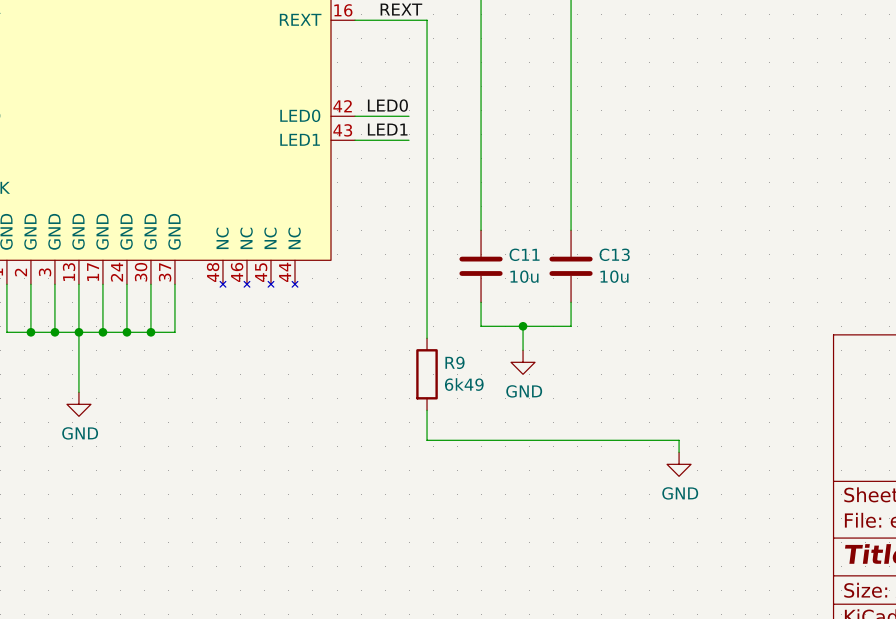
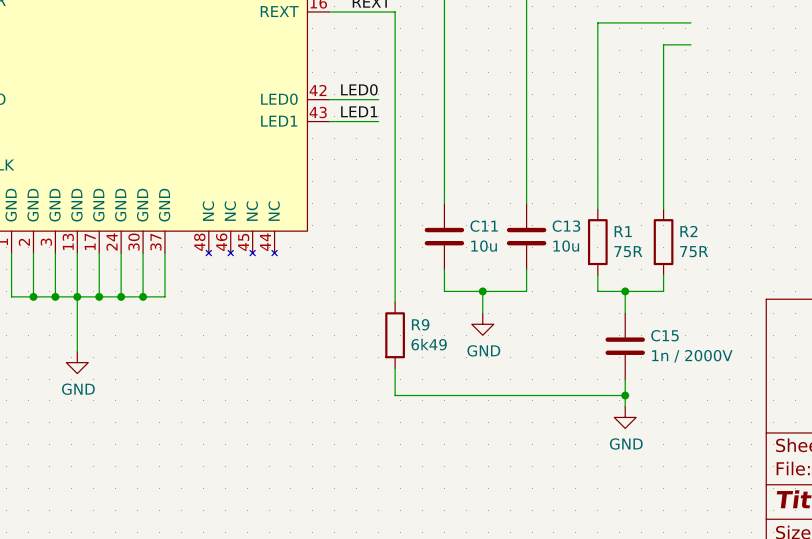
wire: none -> (690, 22) (597, 22) (597, 209)
wire: none -> (690, 44) (663, 44) (663, 209)
R1: none -> 75R (597, 242)
R2: none -> 75R (663, 242)
wire: none -> (597, 274) (597, 291) (663, 291) (663, 274)
wire: none -> (625, 291) (625, 313)
junction: none -> (625, 291)
C15: none -> 1n / 2000V (625, 346)
wire: none -> (625, 379) (625, 395)
junction: none -> (625, 395)

